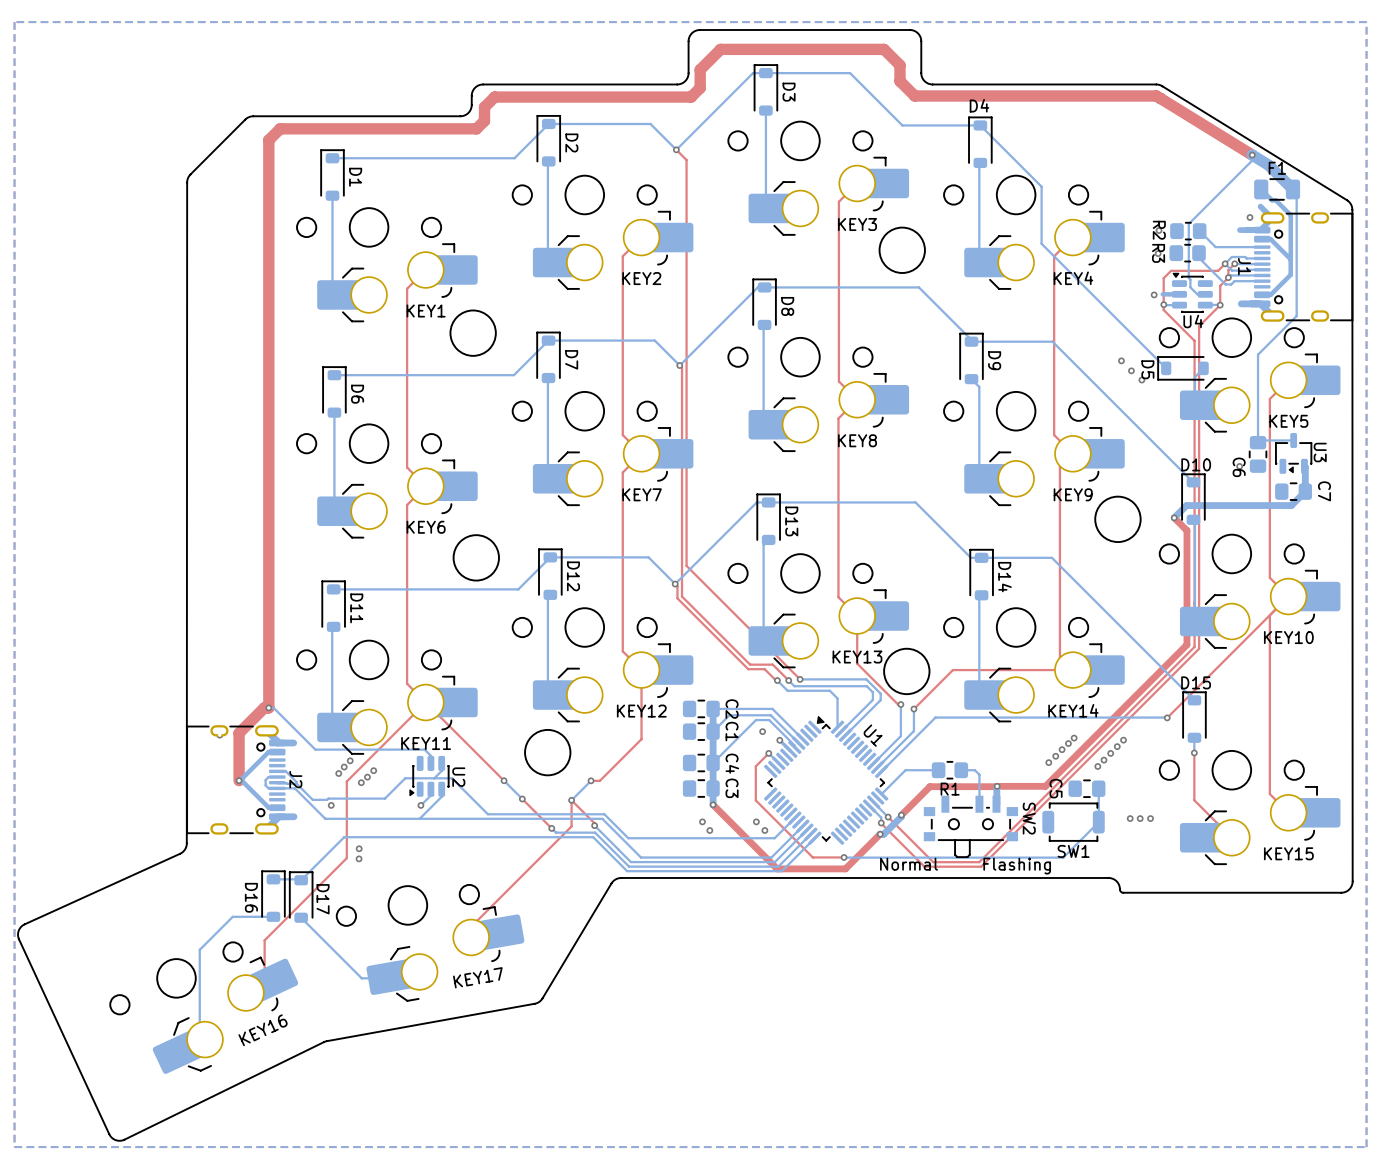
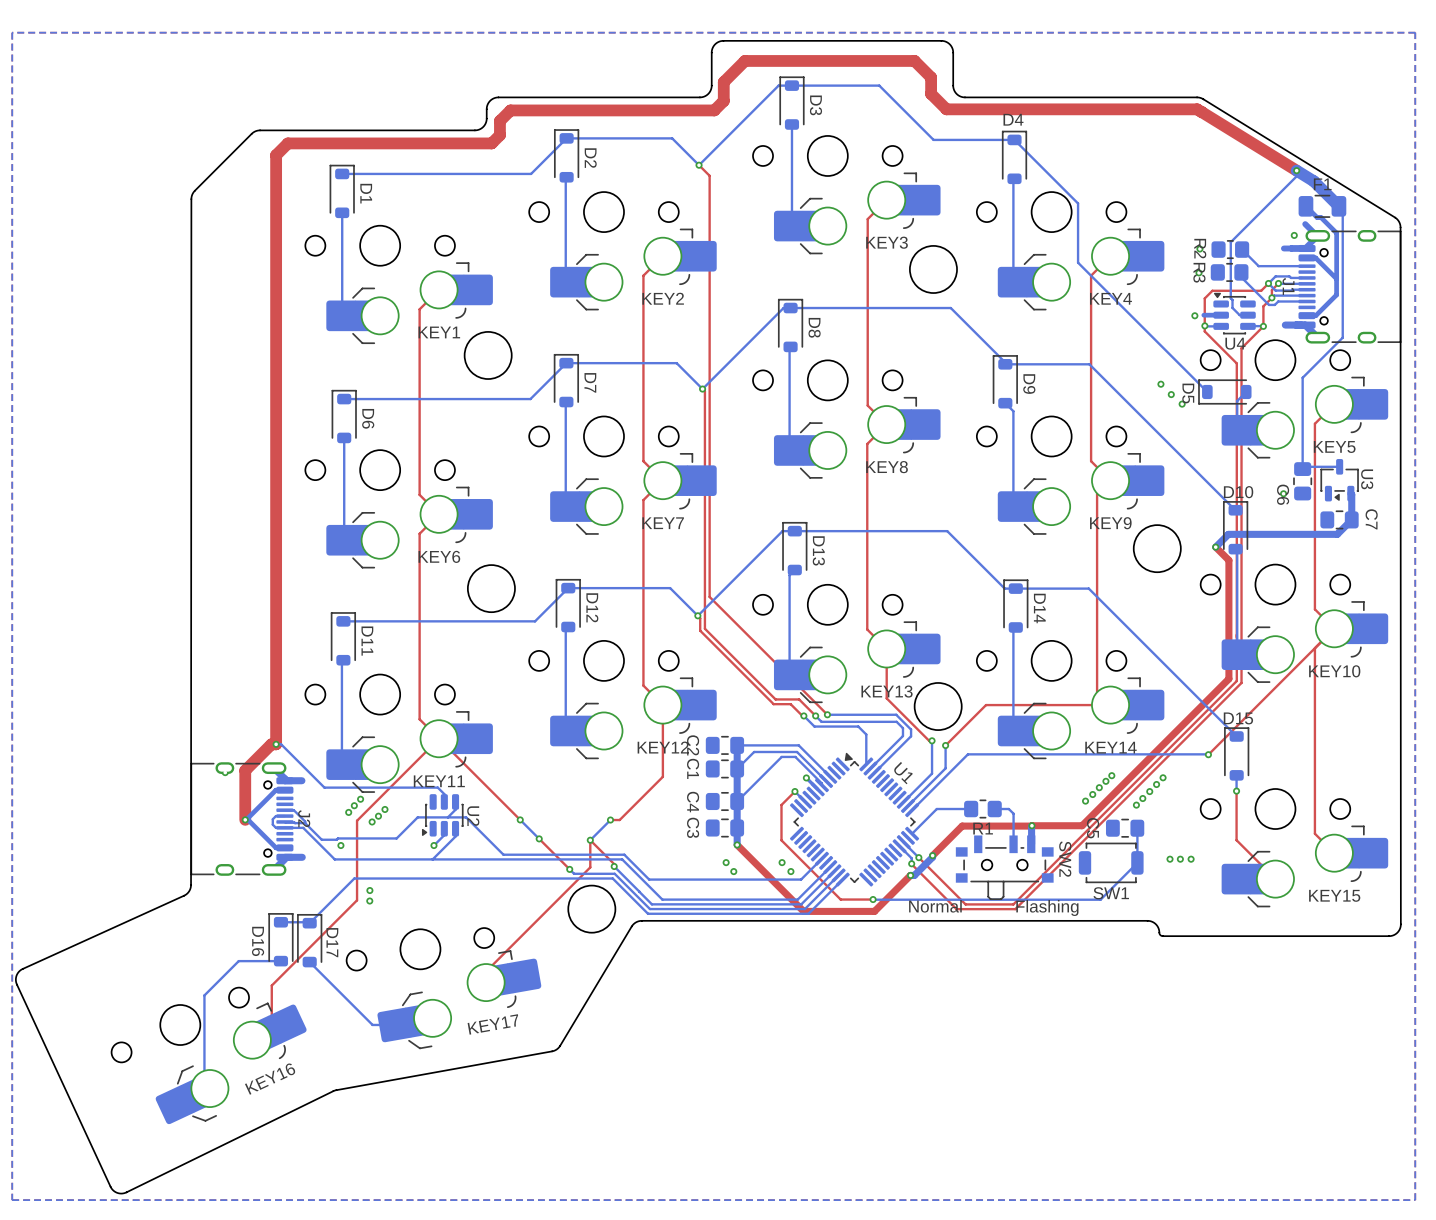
C2 name position: C2 (732, 709) -> C2 (693, 745)
C1 name position: C1 (732, 731) -> C1 (693, 768)
via: (762, 731) -> none
round board edge position: (547, 752) -> (591, 909)
C4 name position: C4 (732, 763) -> C4 (693, 802)
C3 name position: C3 (732, 788) -> C3 (693, 827)

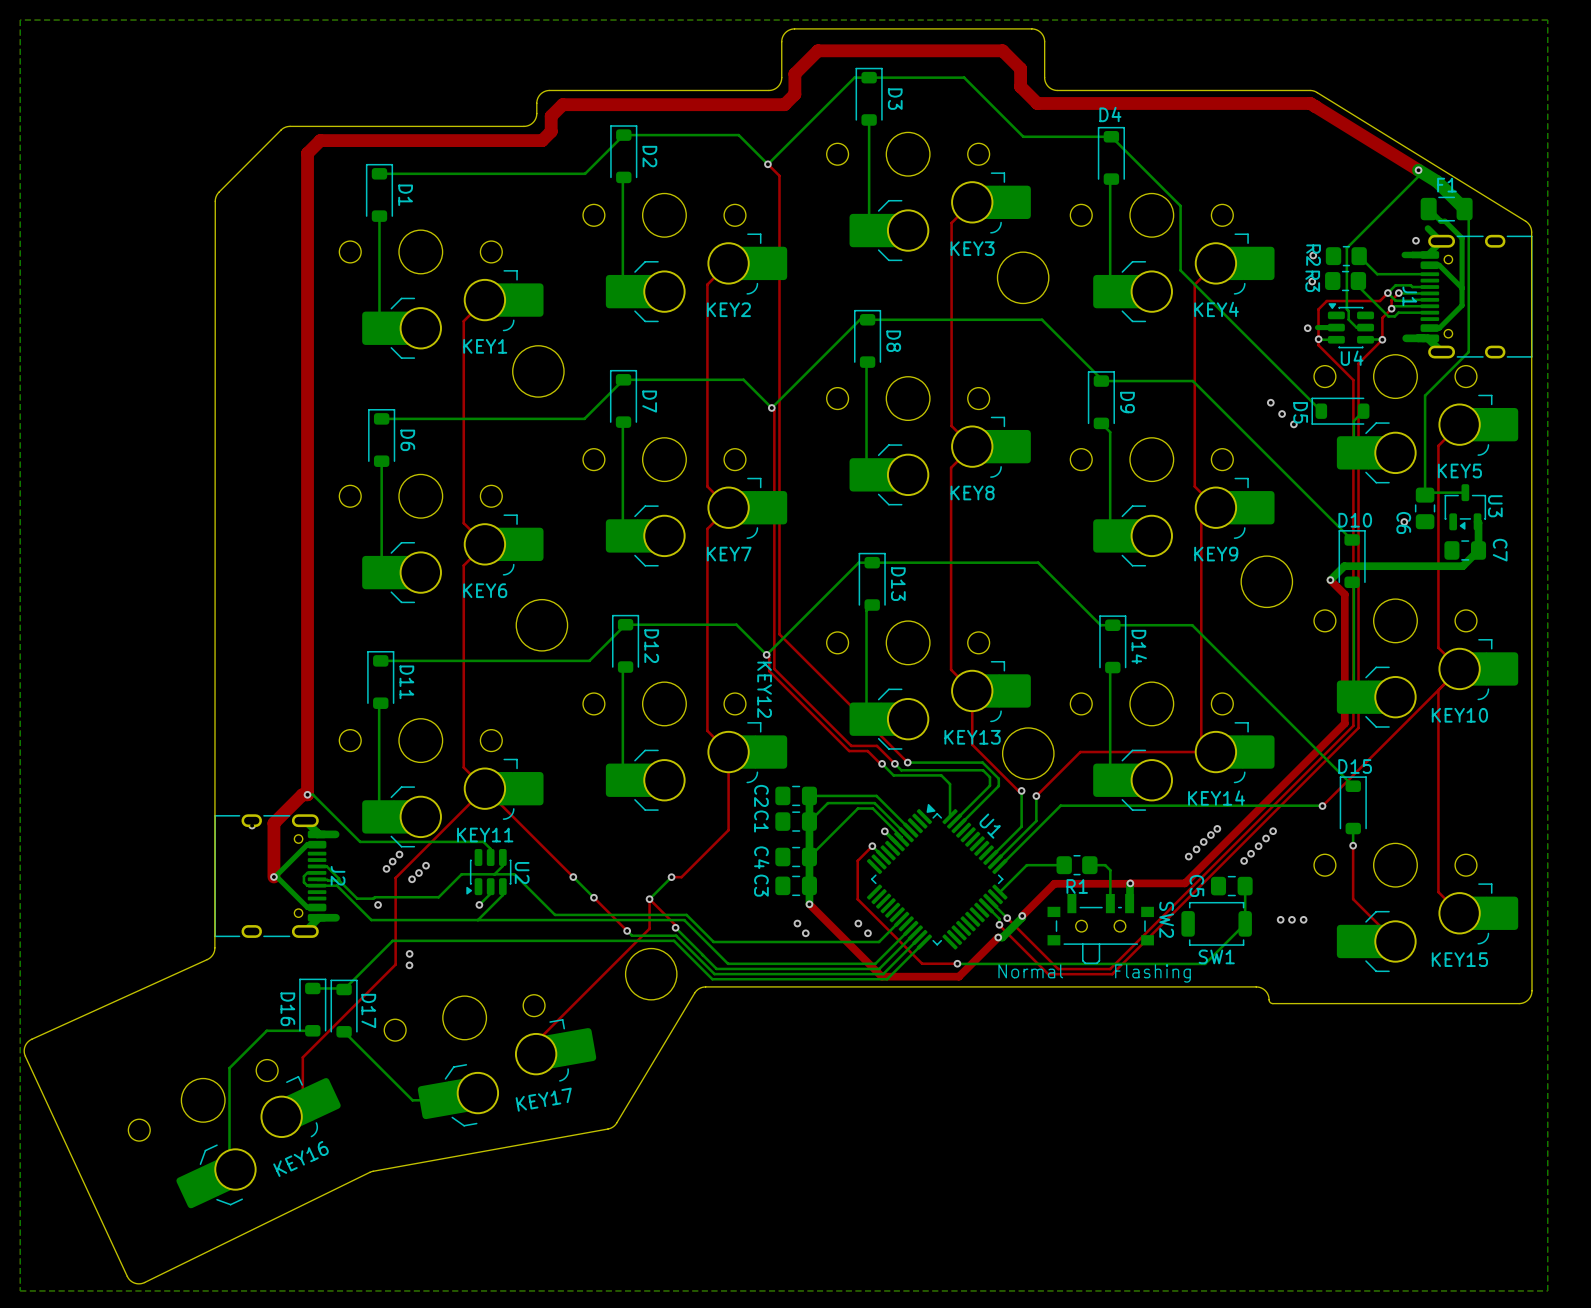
KEY12 name rotation: 0° (663, 747) -> 90° clockwise (764, 689)
KEY12 name position: KEY12 (663, 747) -> KEY12 (764, 689)

